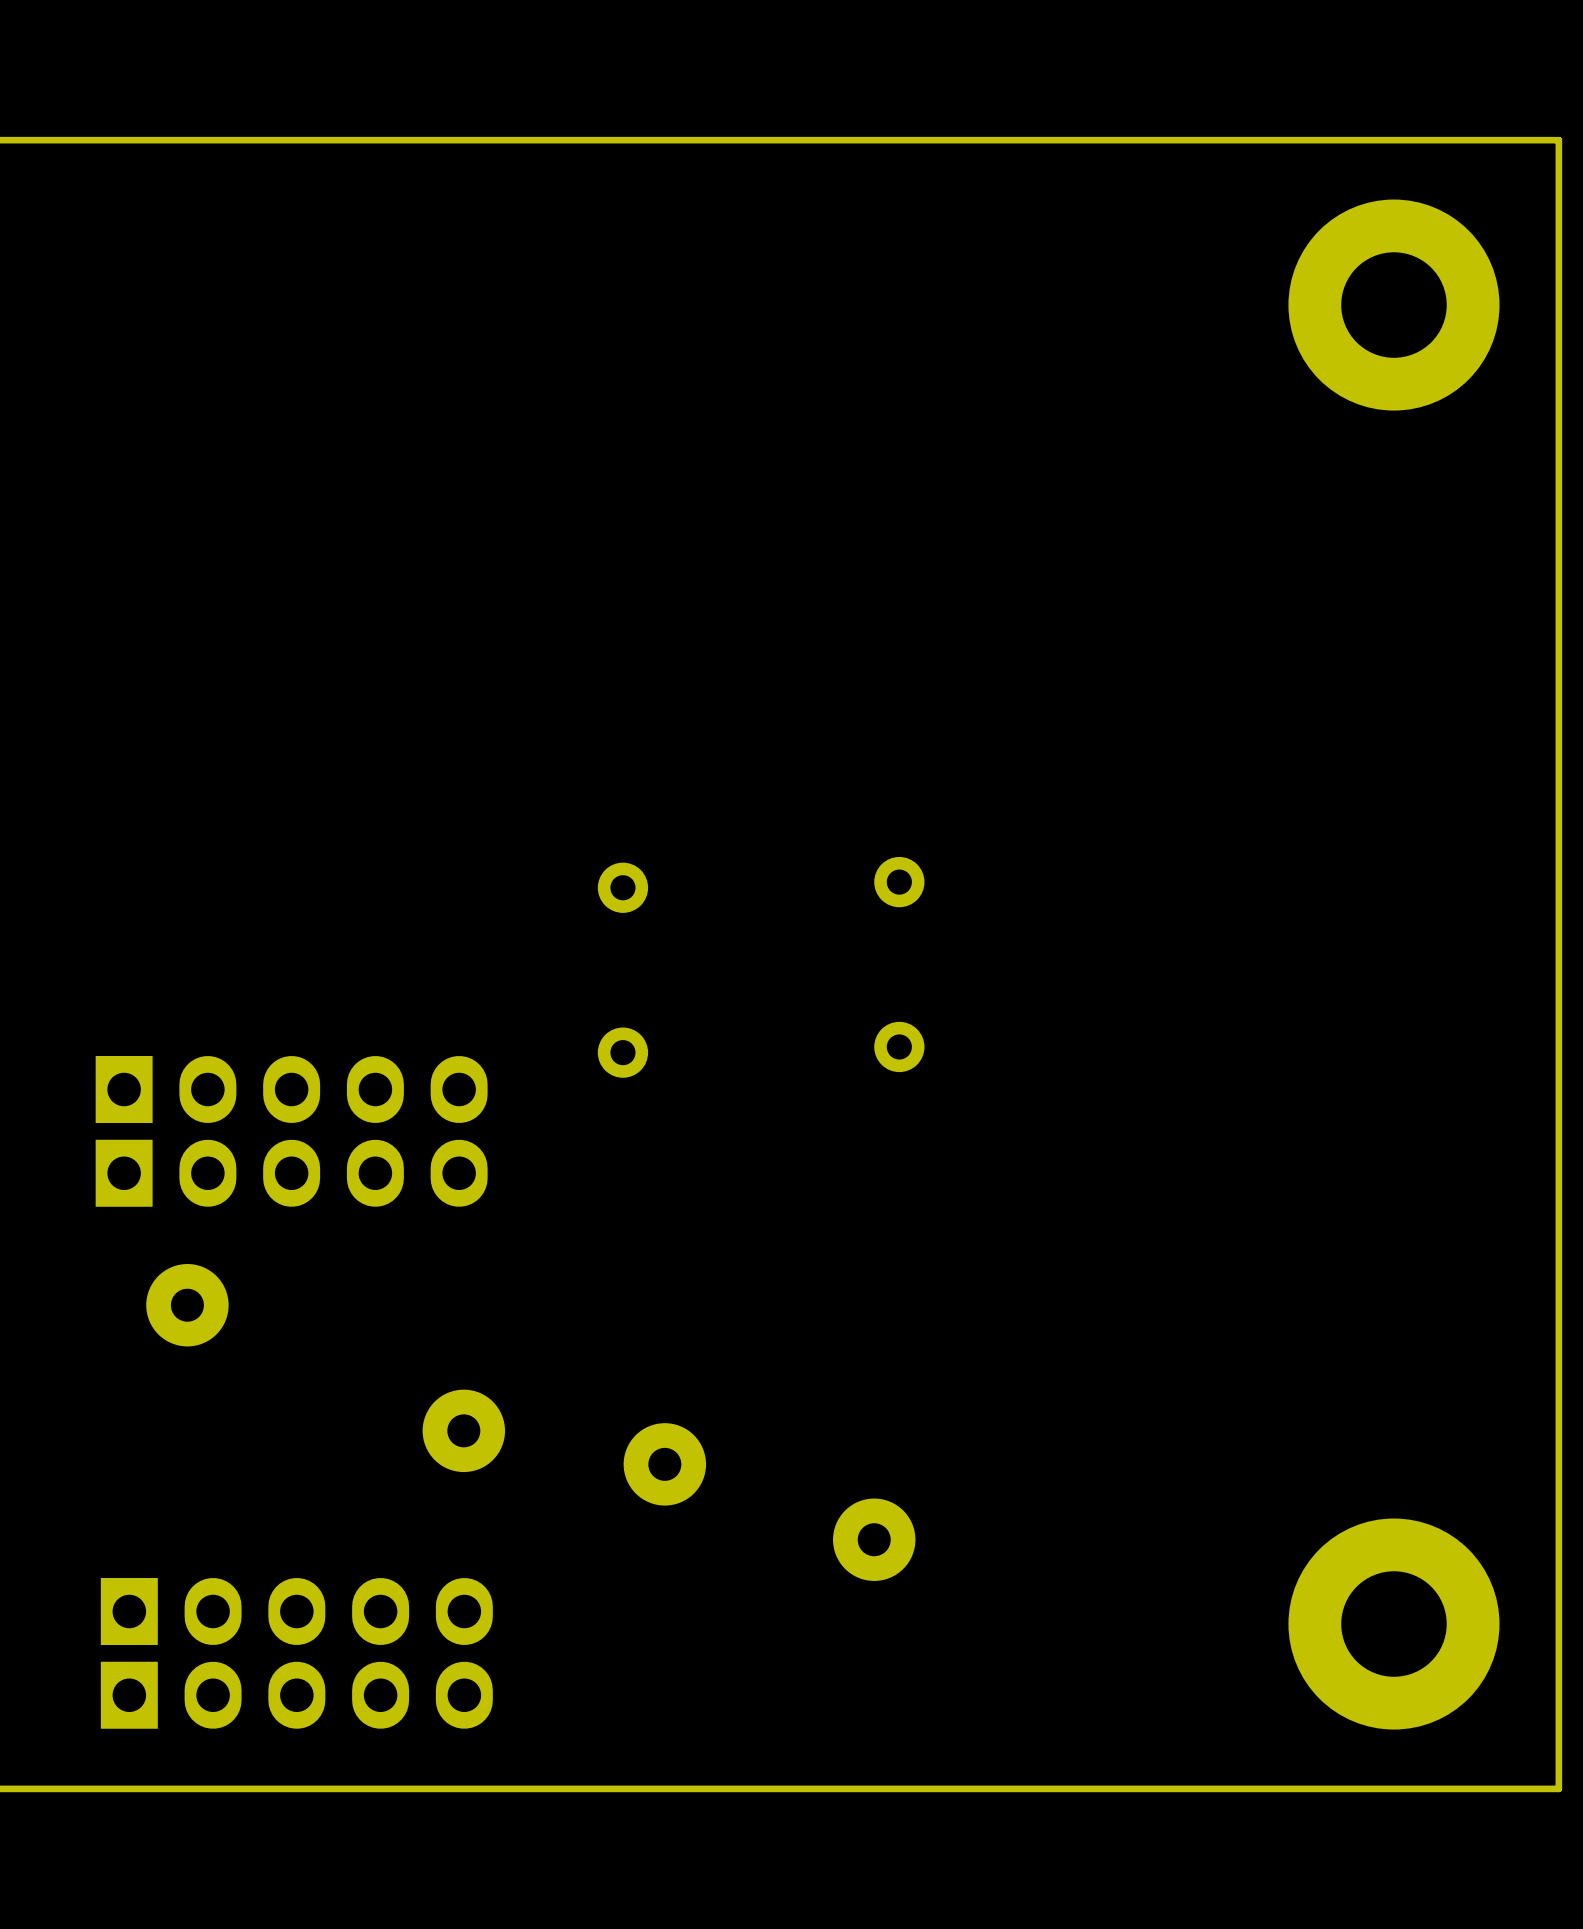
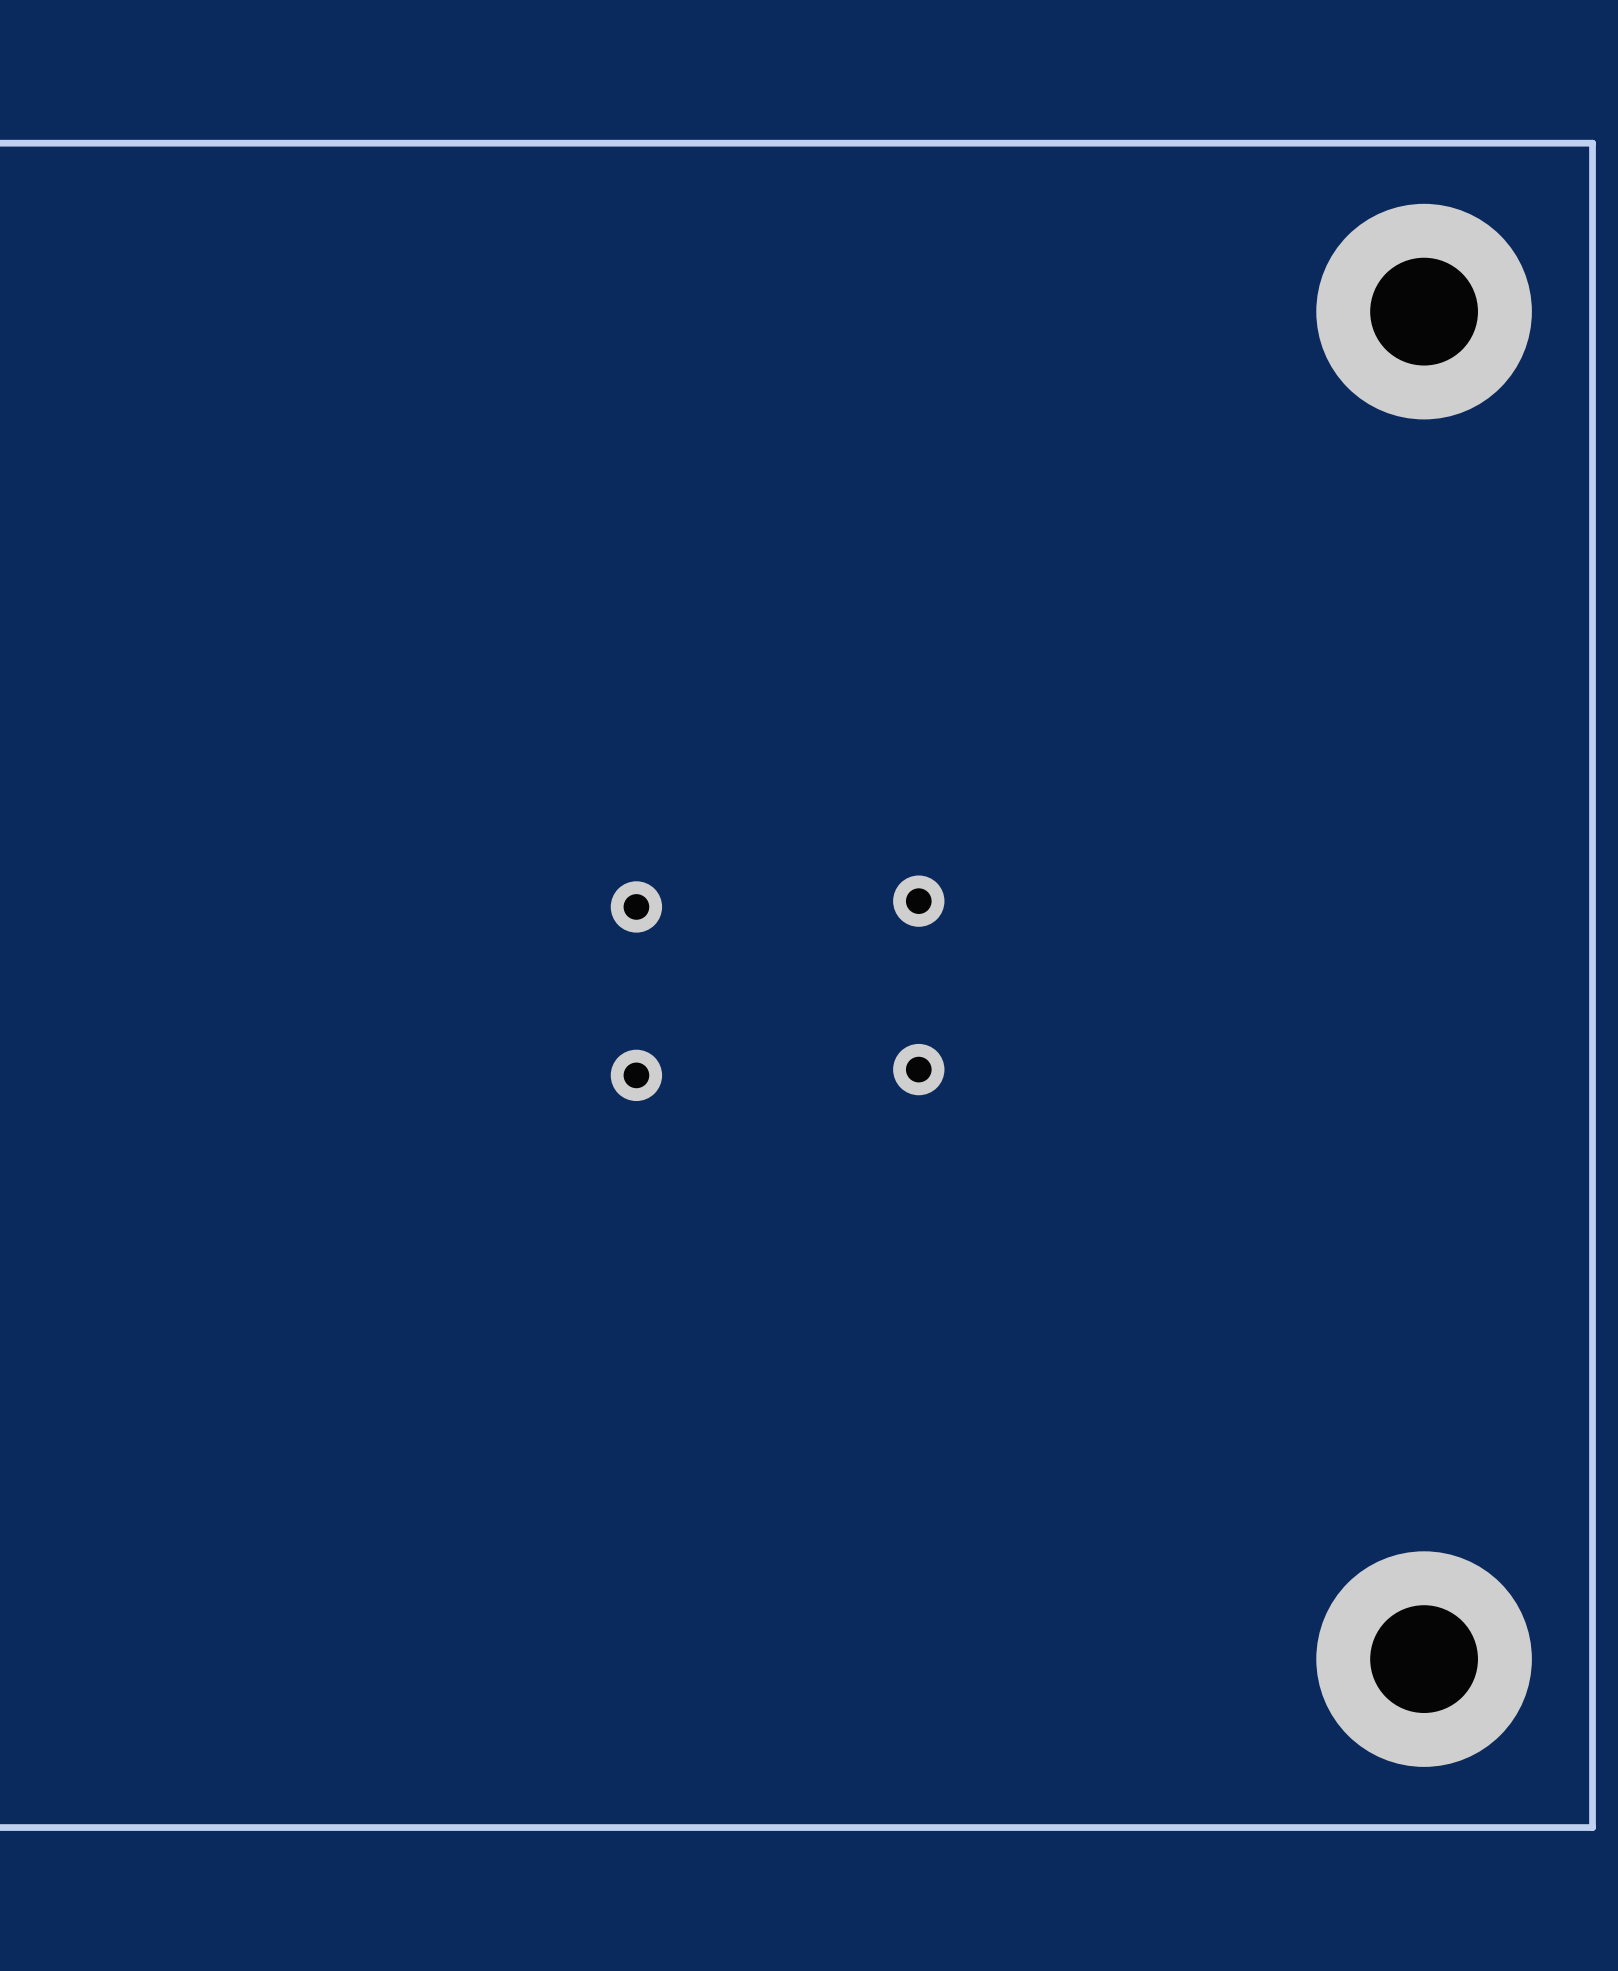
part: (291, 1089) -> none
part: (291, 1173) -> none
part: (187, 1305) -> none
part: (463, 1430) -> none
part: (664, 1464) -> none
part: (874, 1539) -> none
part: (296, 1611) -> none
part: (296, 1695) -> none

